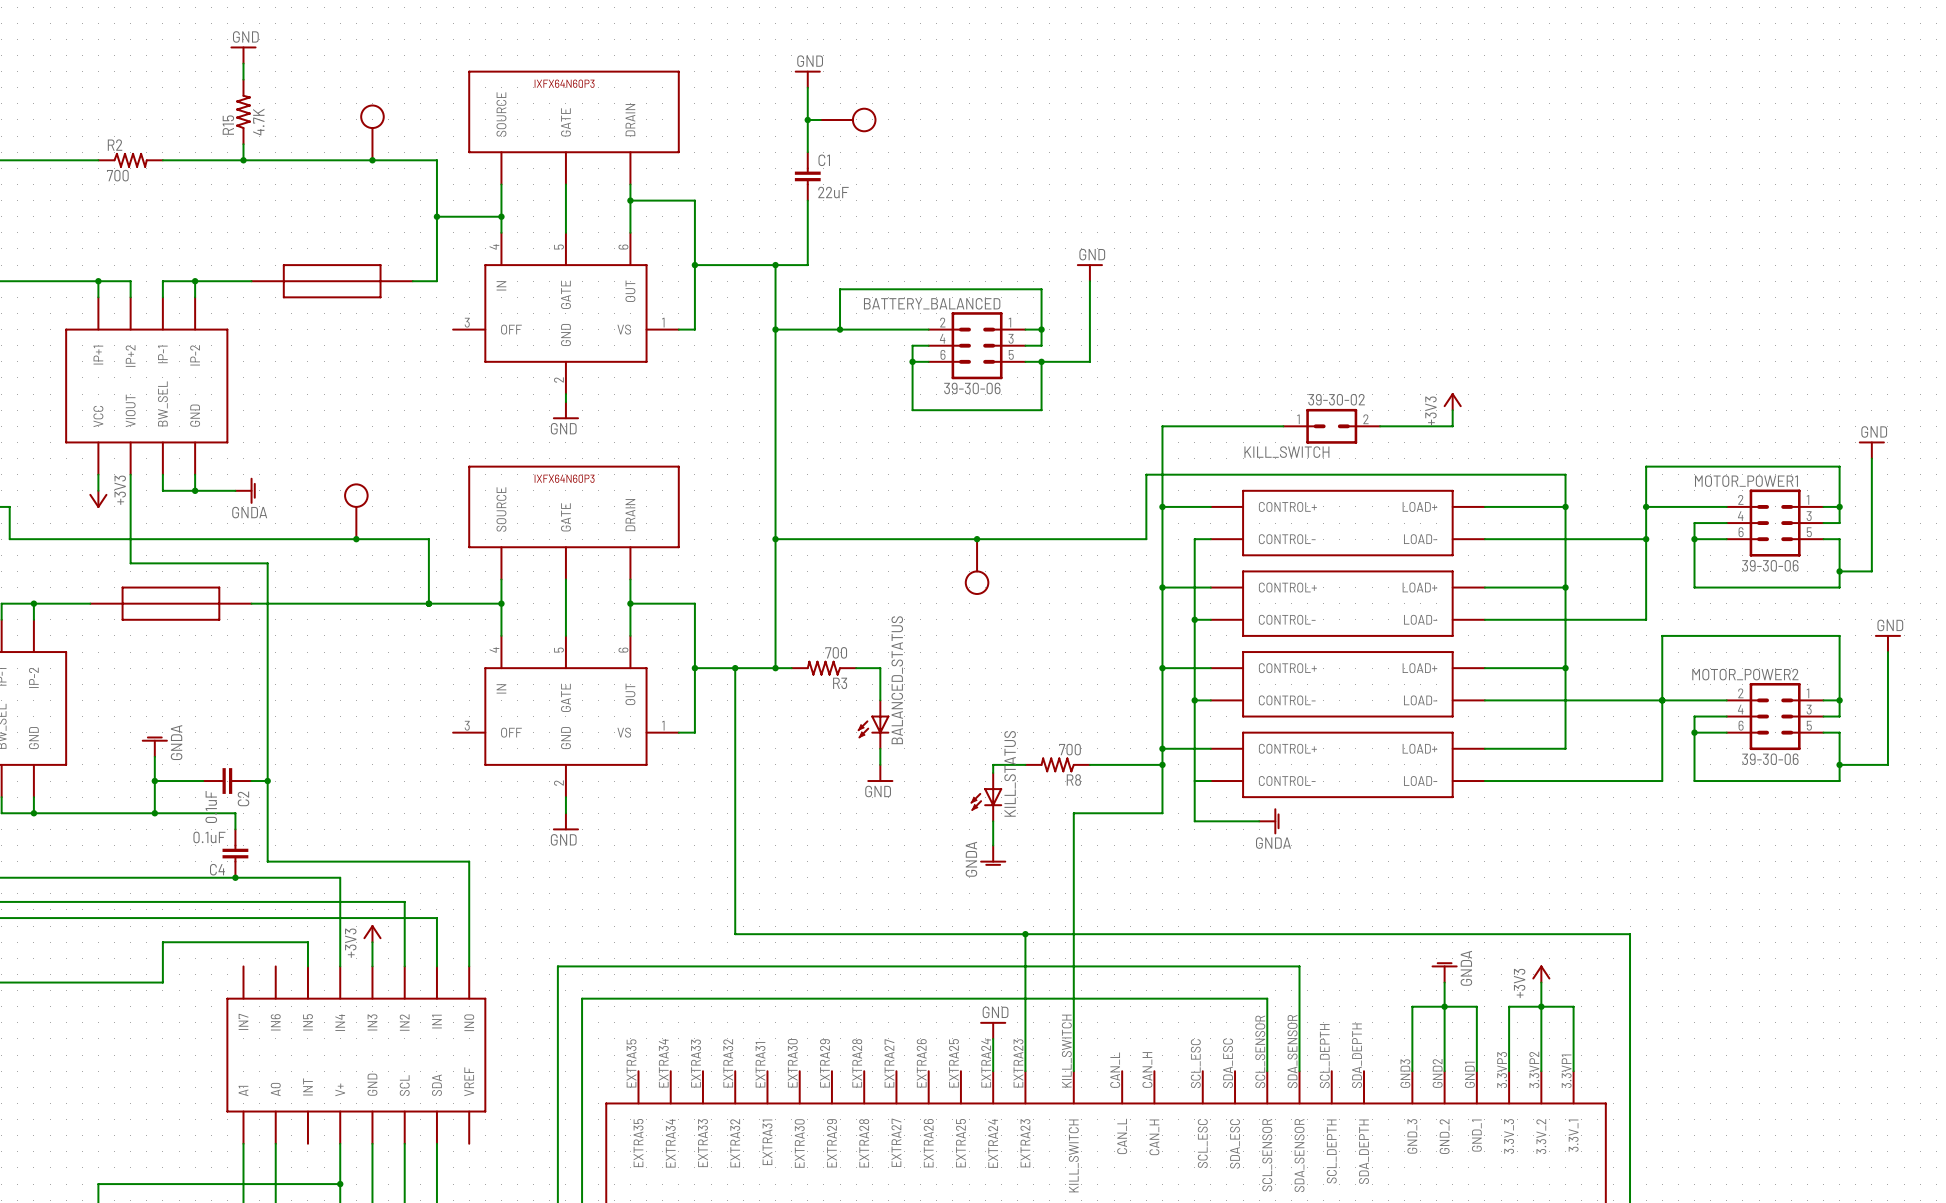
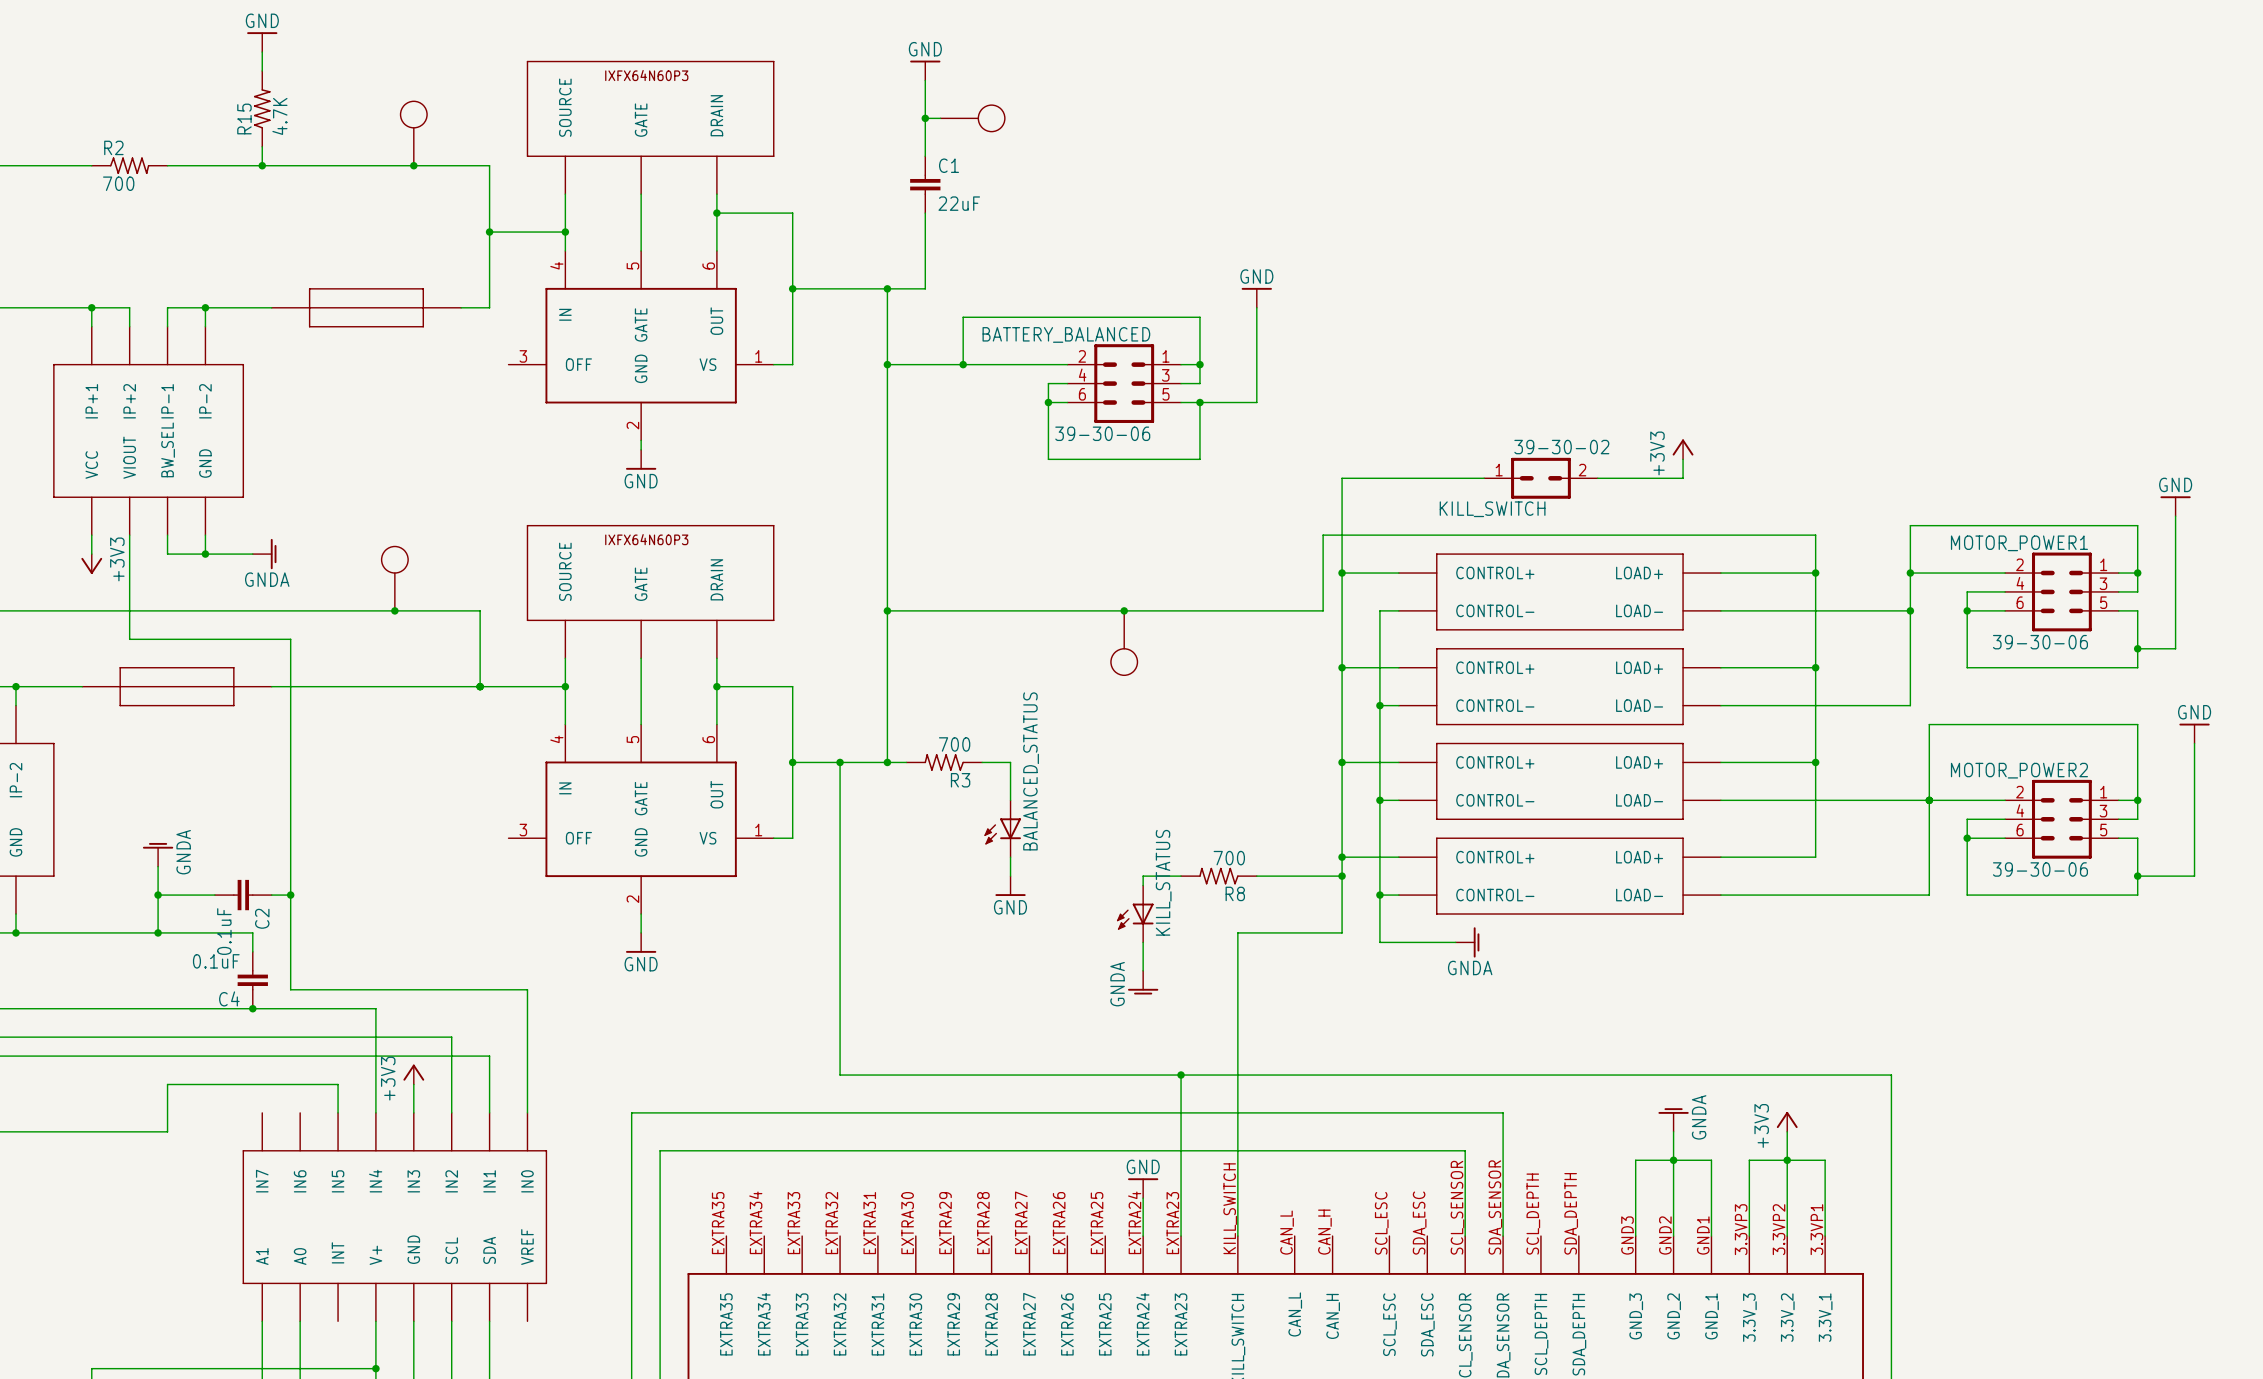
junction: none -> (1379, 895)

